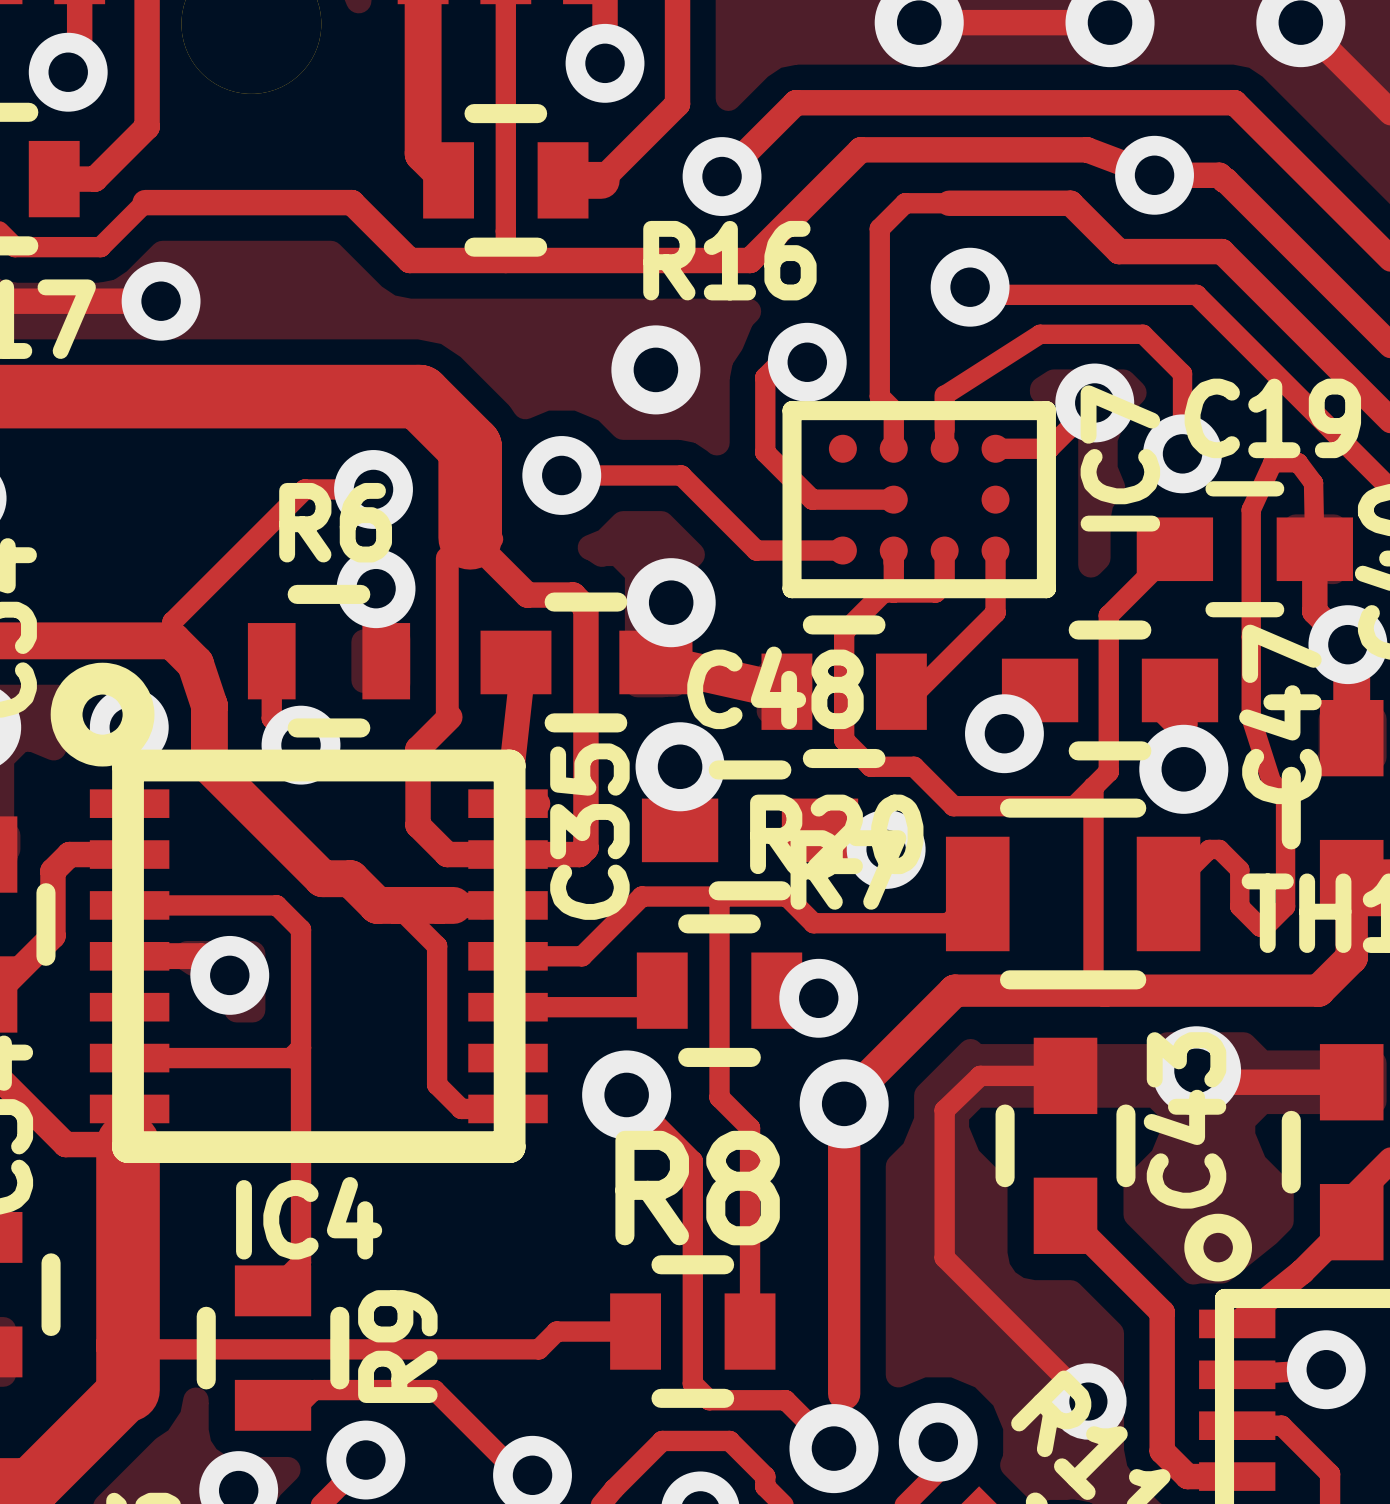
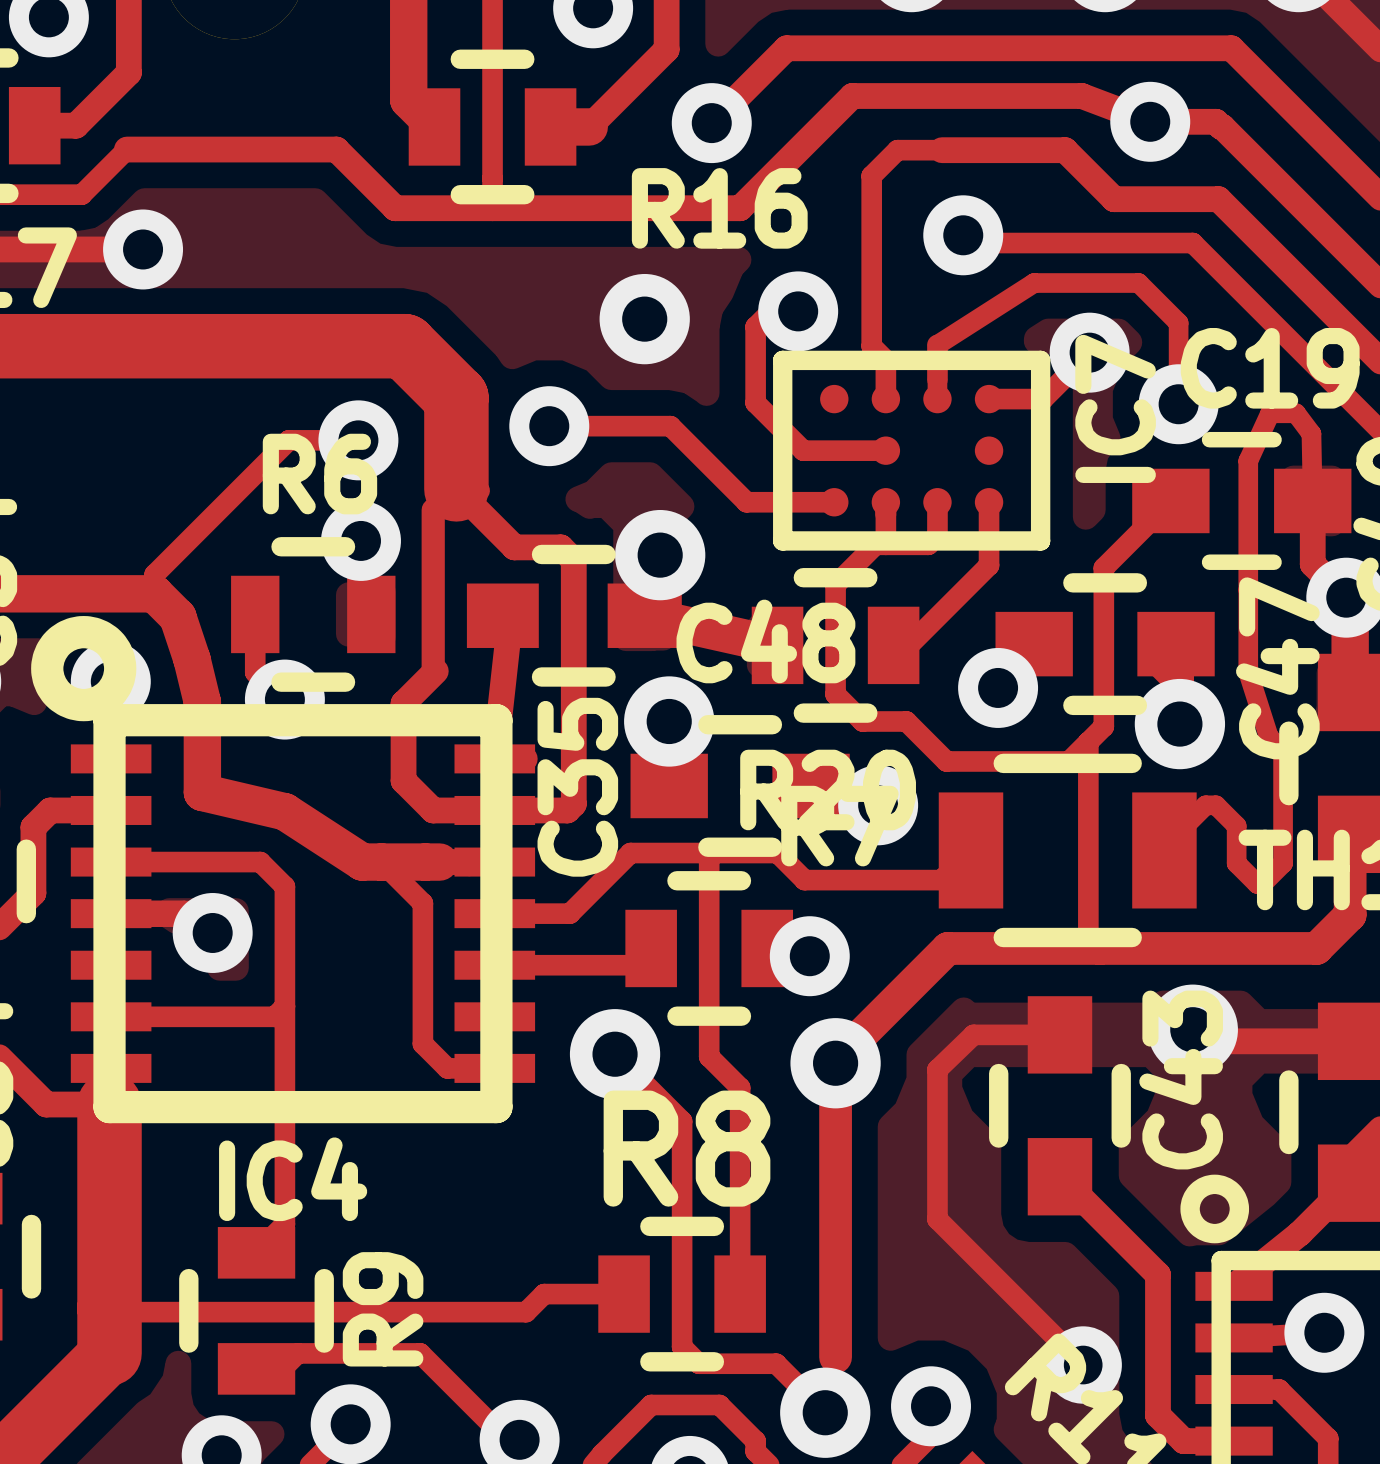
track: (209, 705) (209, 765) (322, 878) (350, 878) (377, 905) -> (192, 659) (202, 702) (202, 792) (284, 811) (362, 862)

